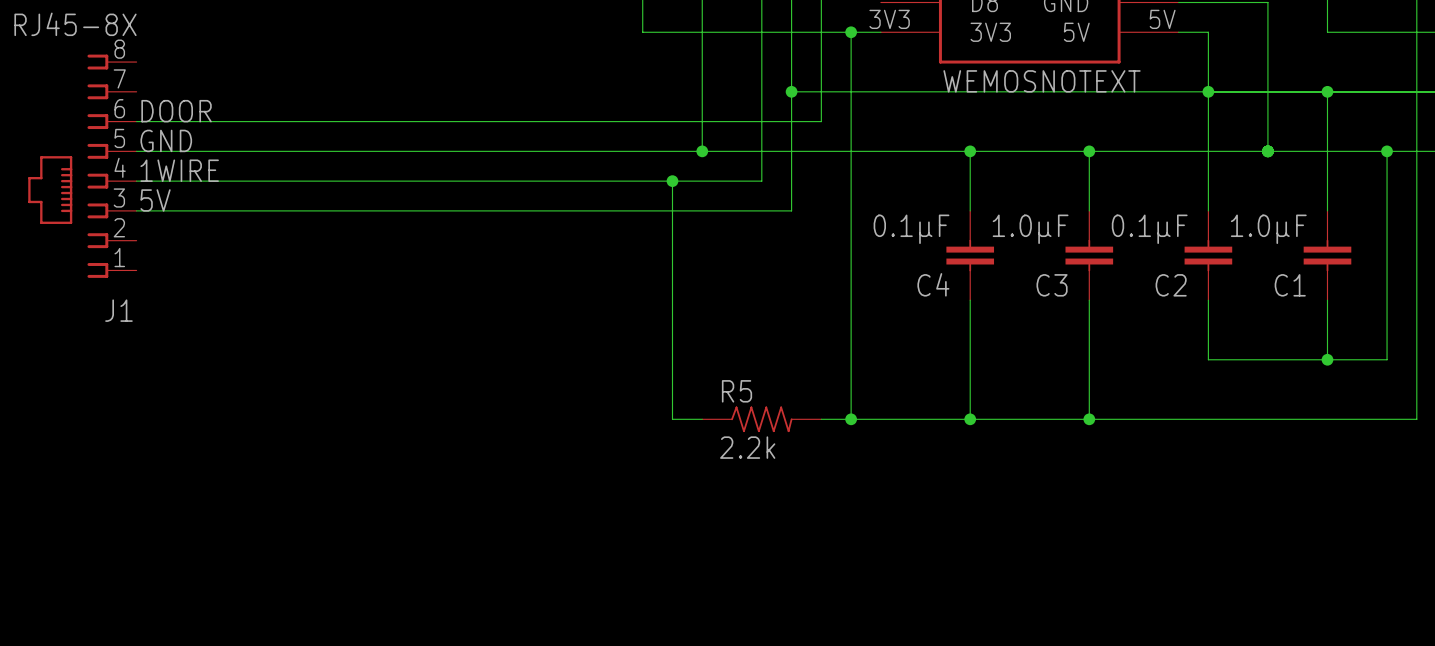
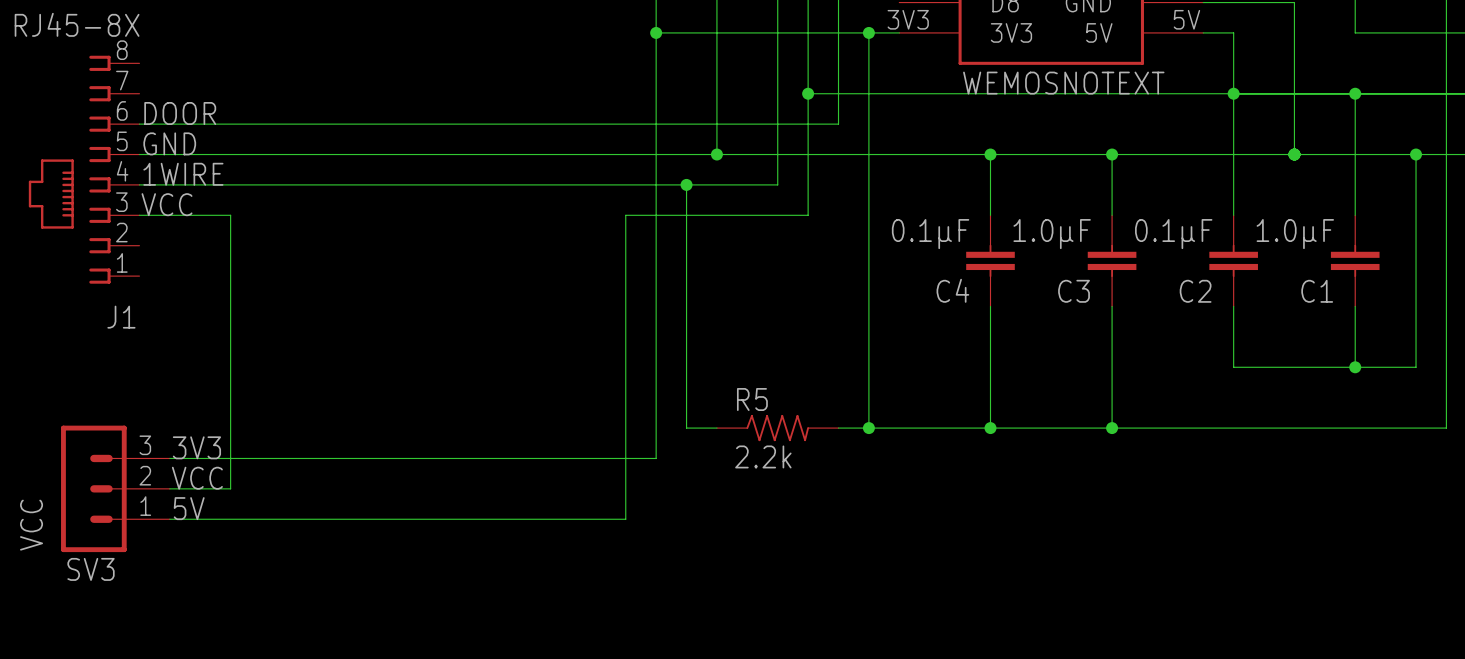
wire: none -> (656, 32) (656, 458) (169, 458)
junction: none -> (656, 32)
label: 5V (155, 200) -> VCC (167, 204)
wire: (225, 210) (612, 210) -> (169, 519) (625, 519) (625, 215)
wire: none -> (230, 215) (230, 488) (169, 488)
label: none -> 3V3 (196, 447)
label: none -> VCC (197, 478)
VCC: none -> SV3 (115, 488)
label: none -> 5V (189, 508)

